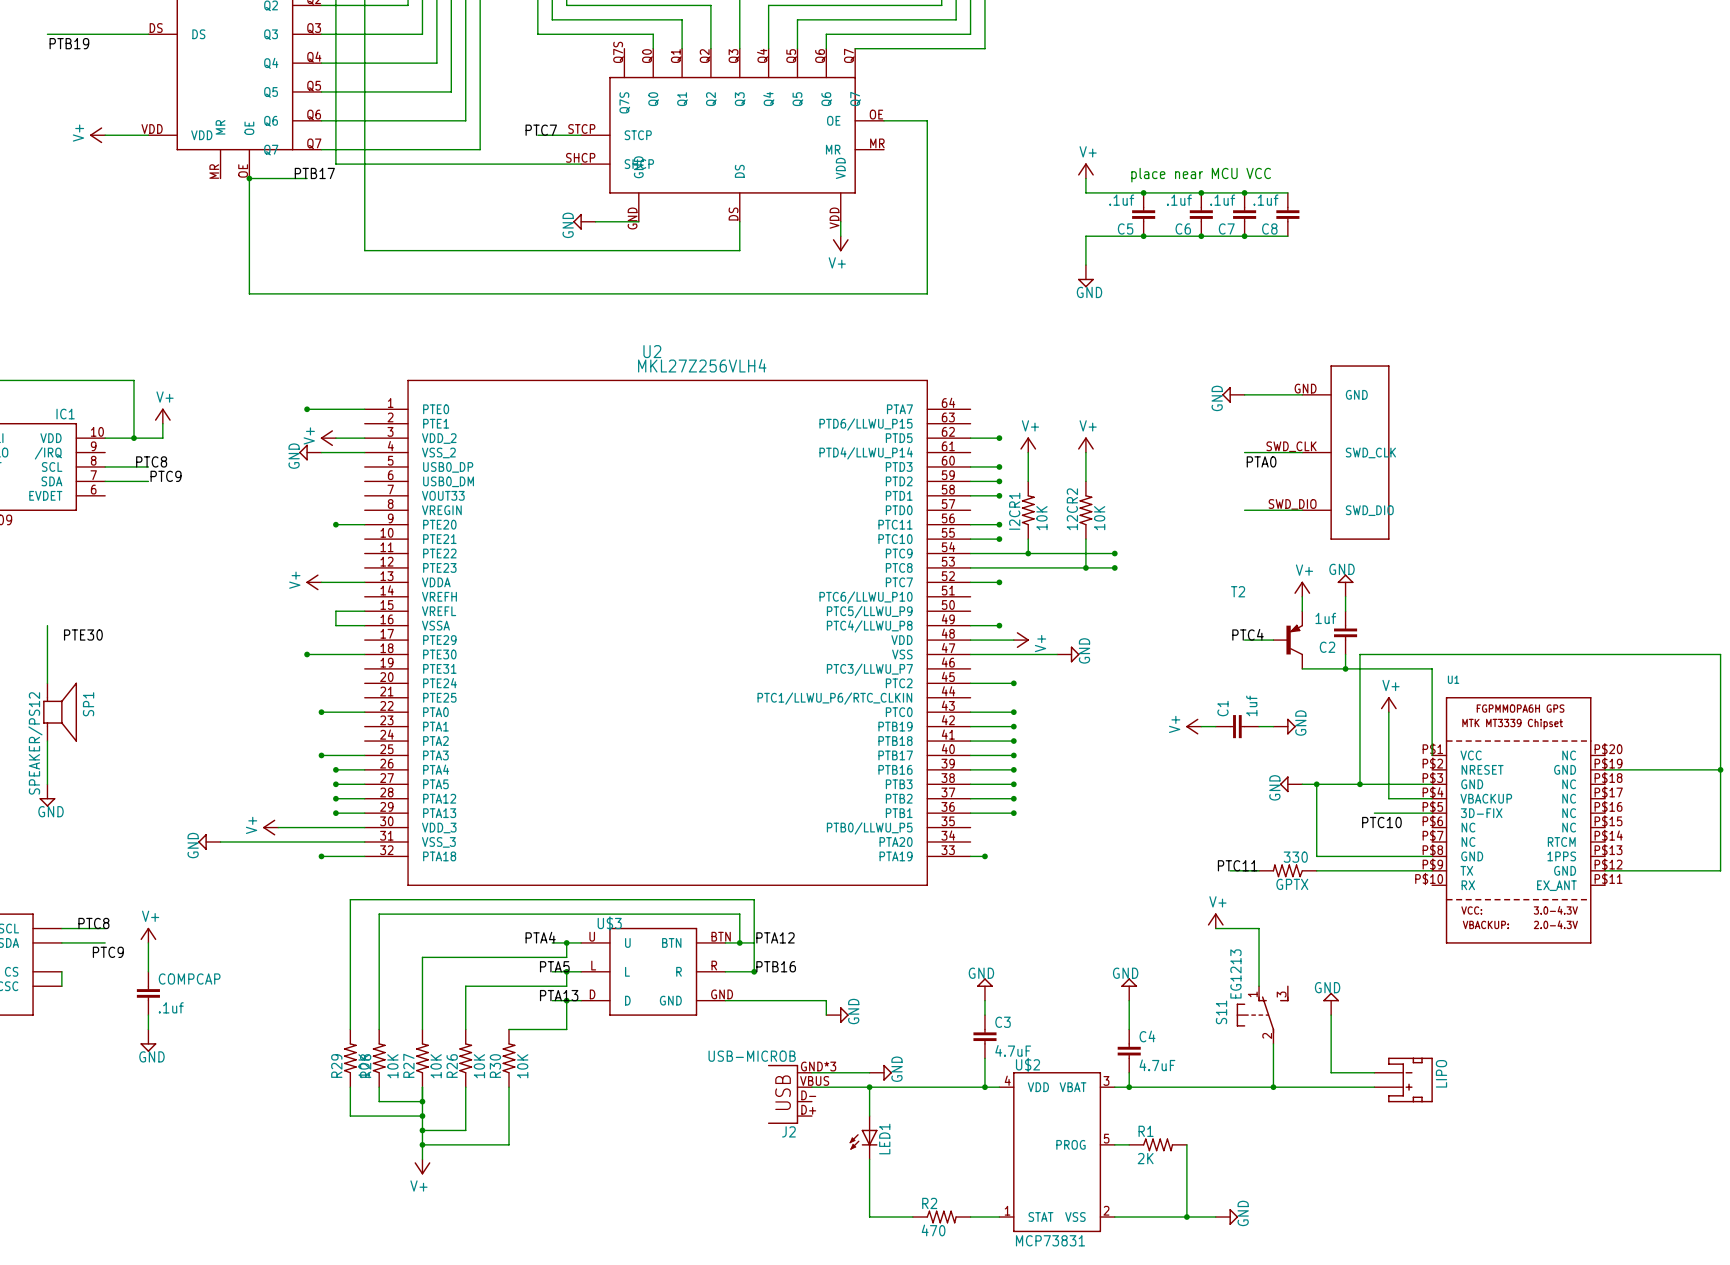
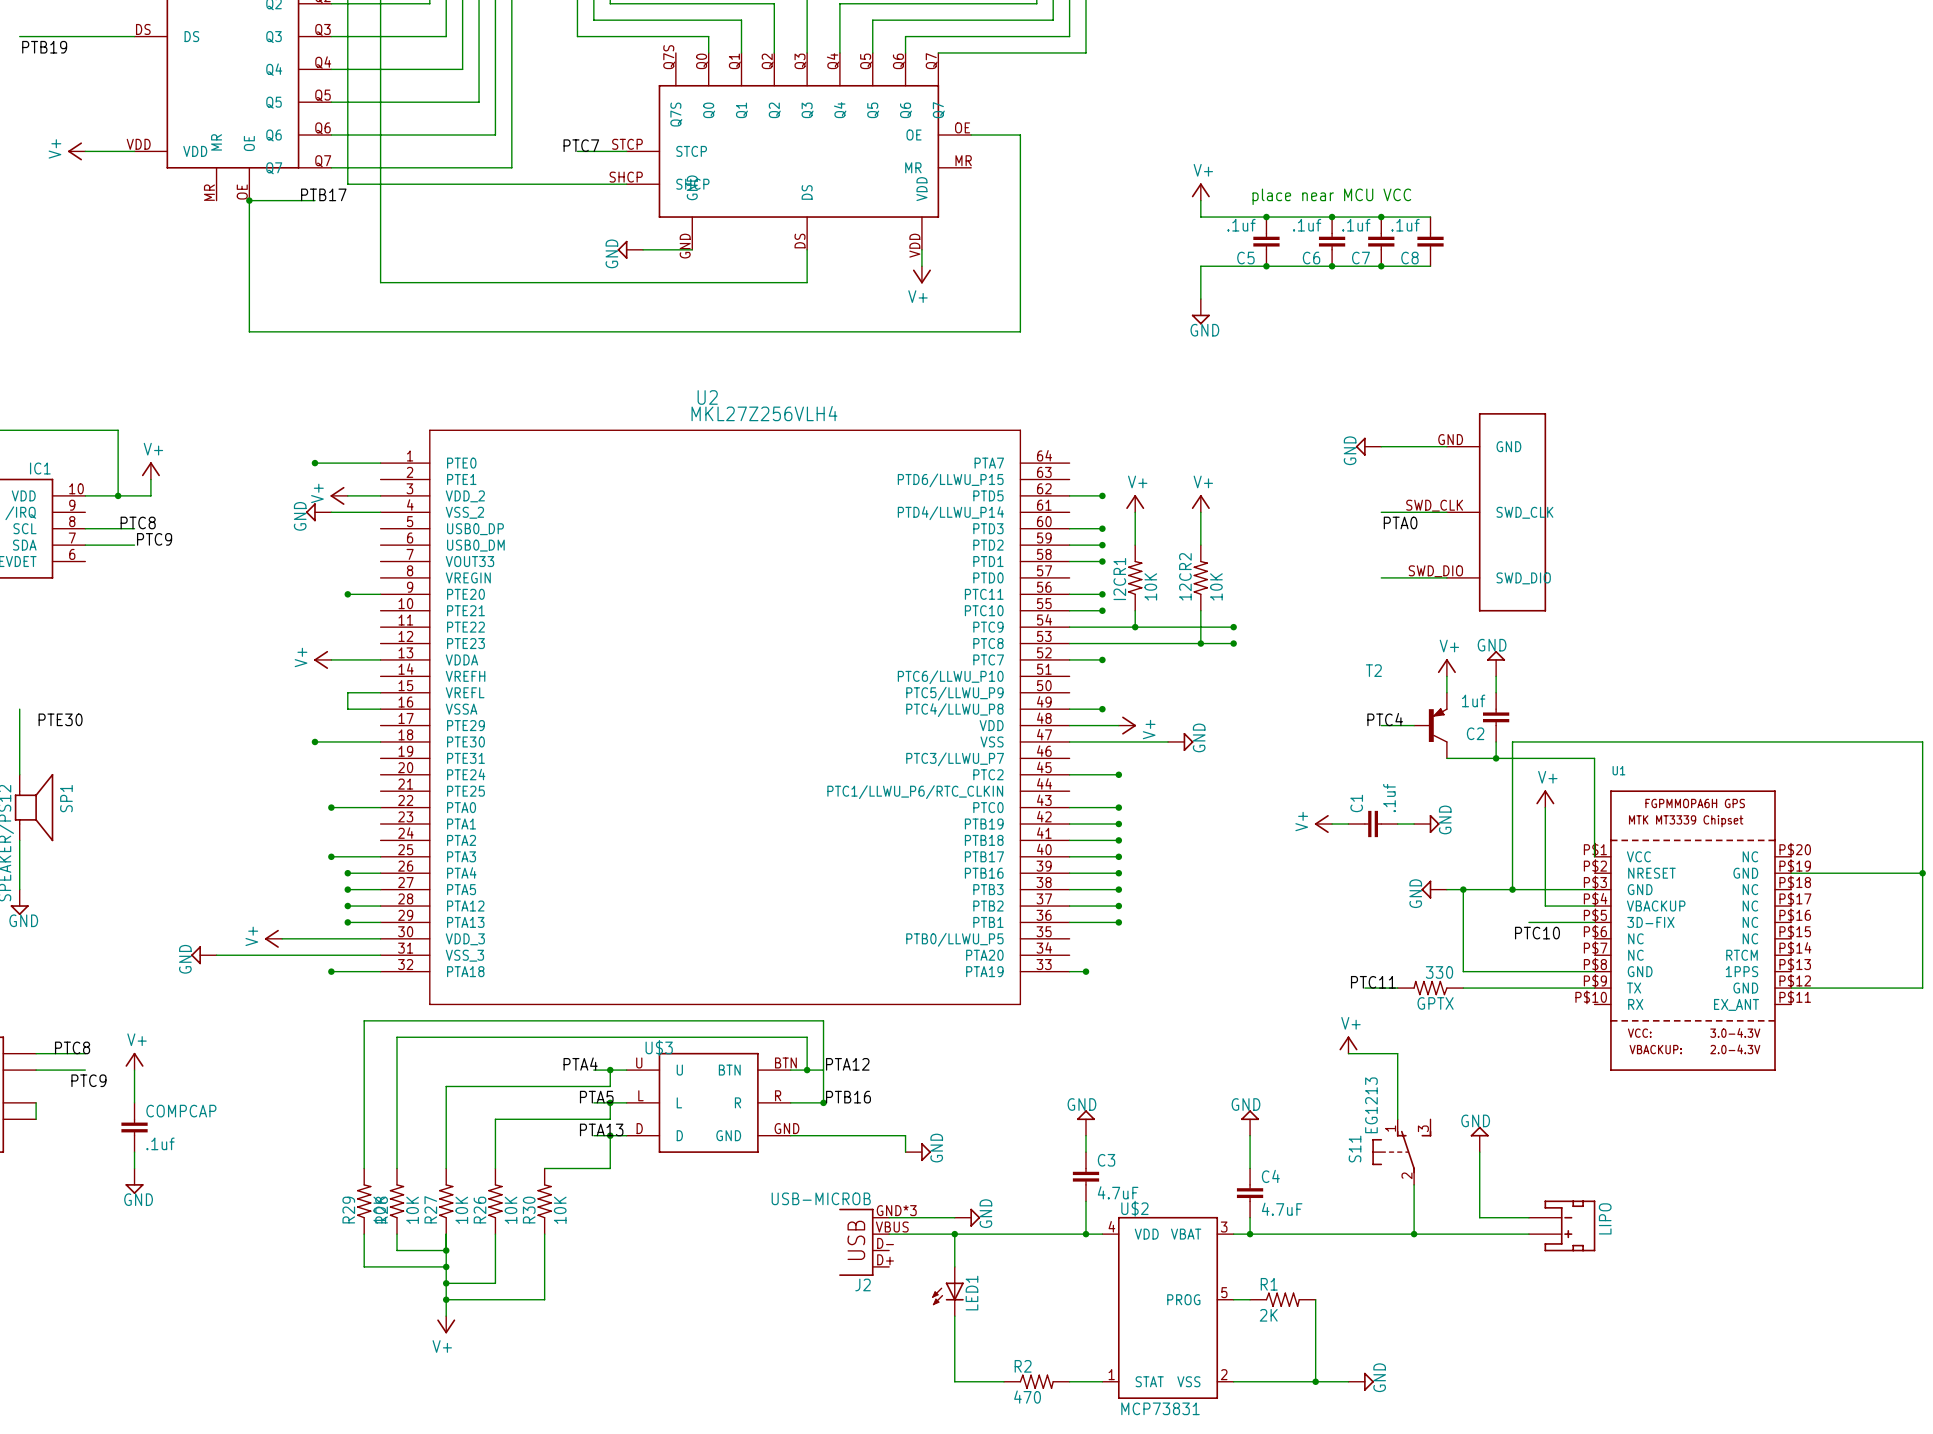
C1 value: 1uf (1251, 705) -> .1uf (1389, 798)

